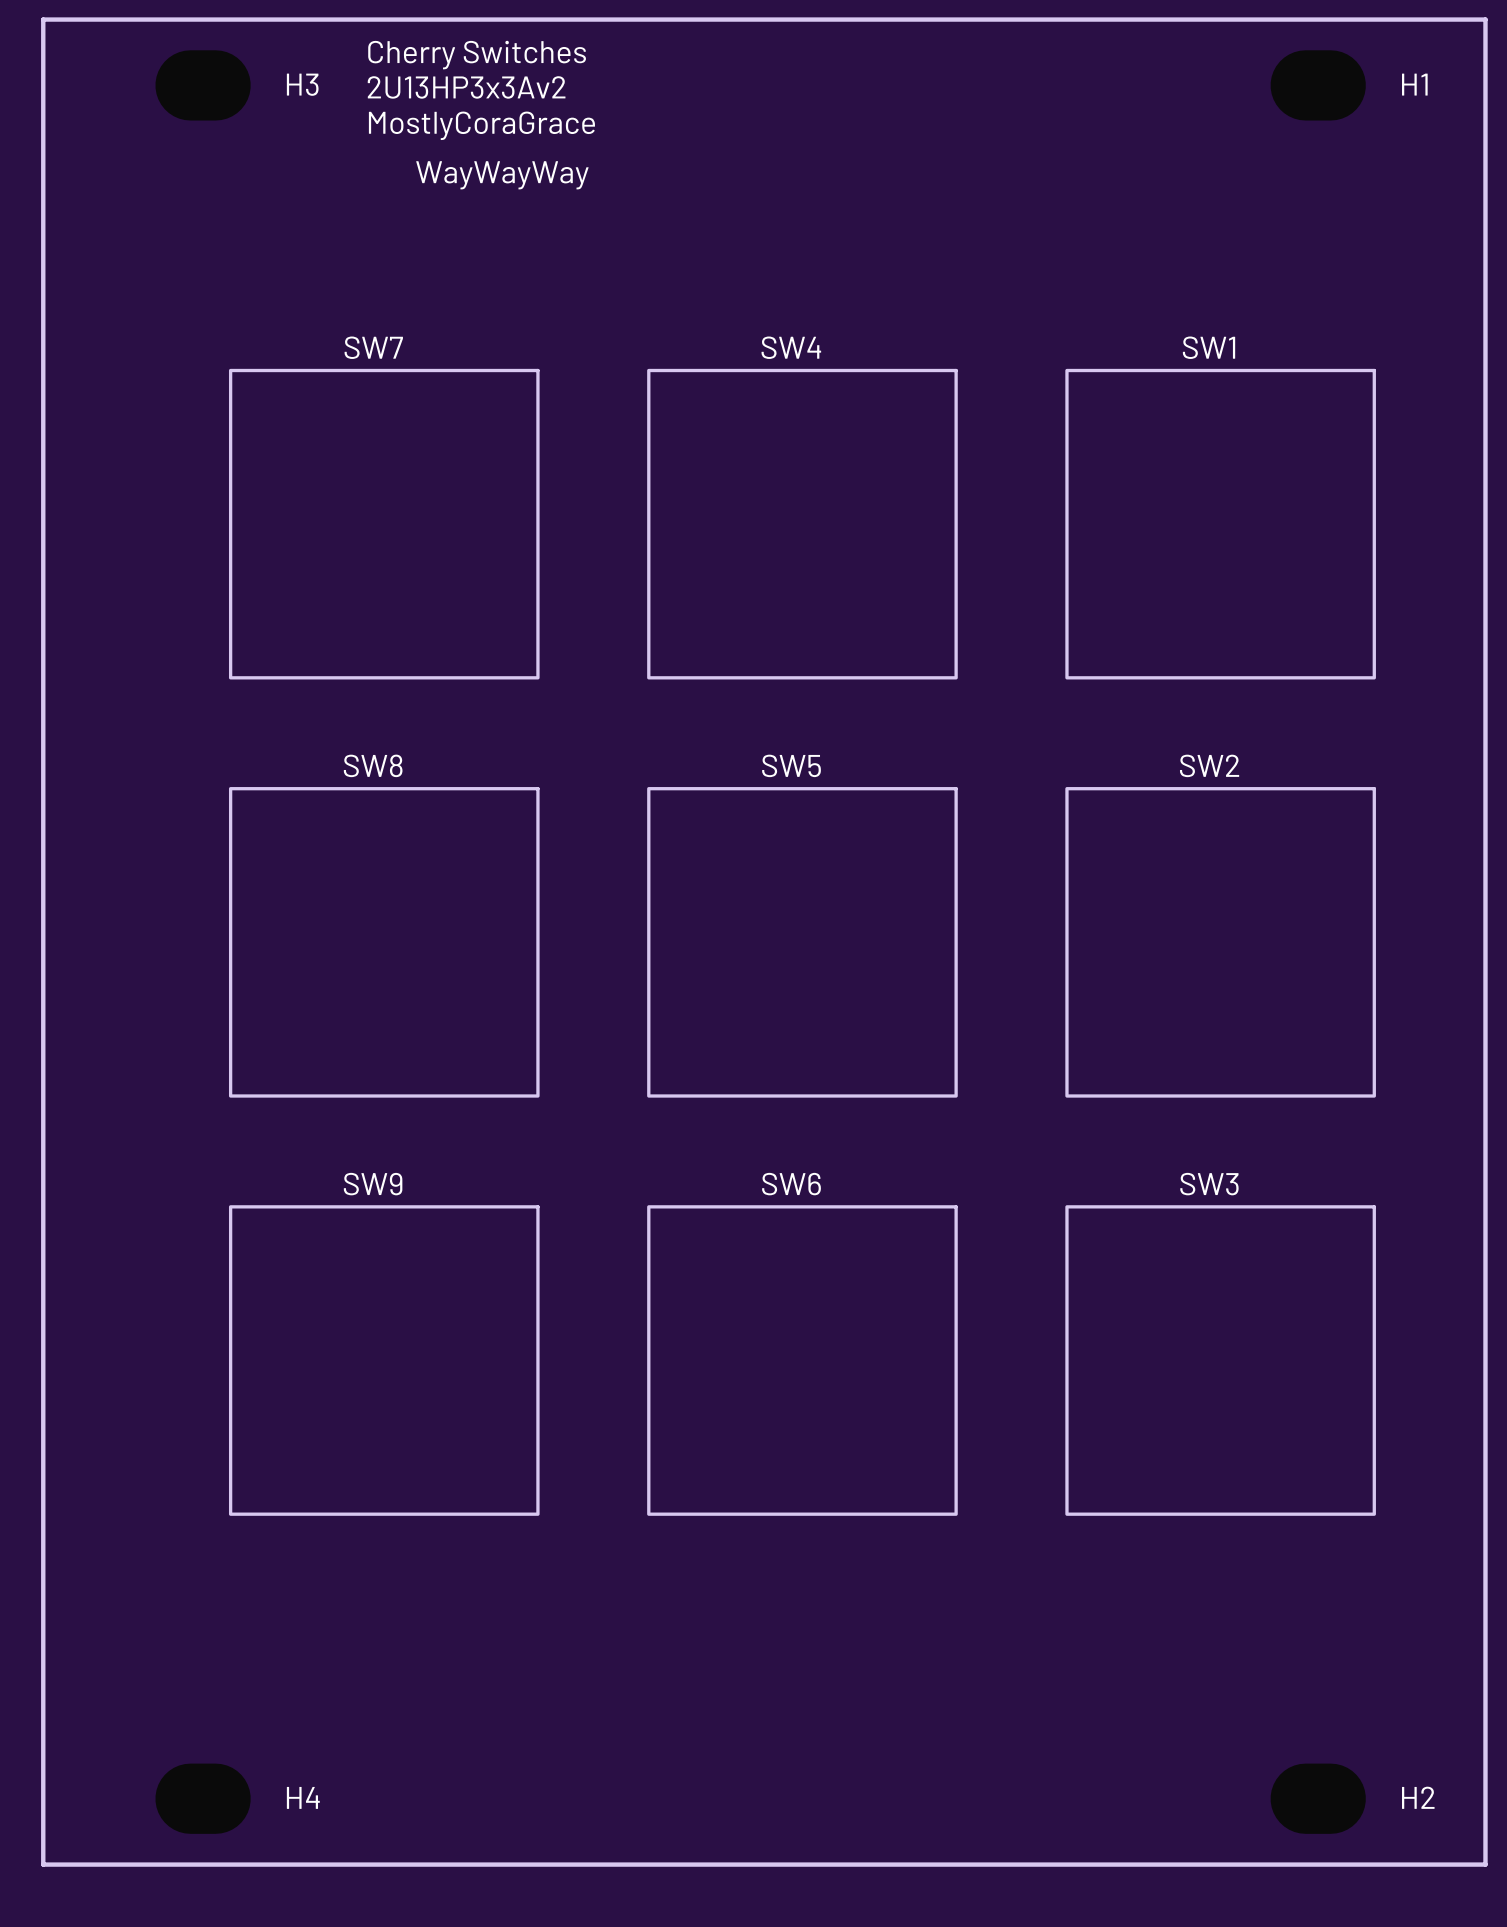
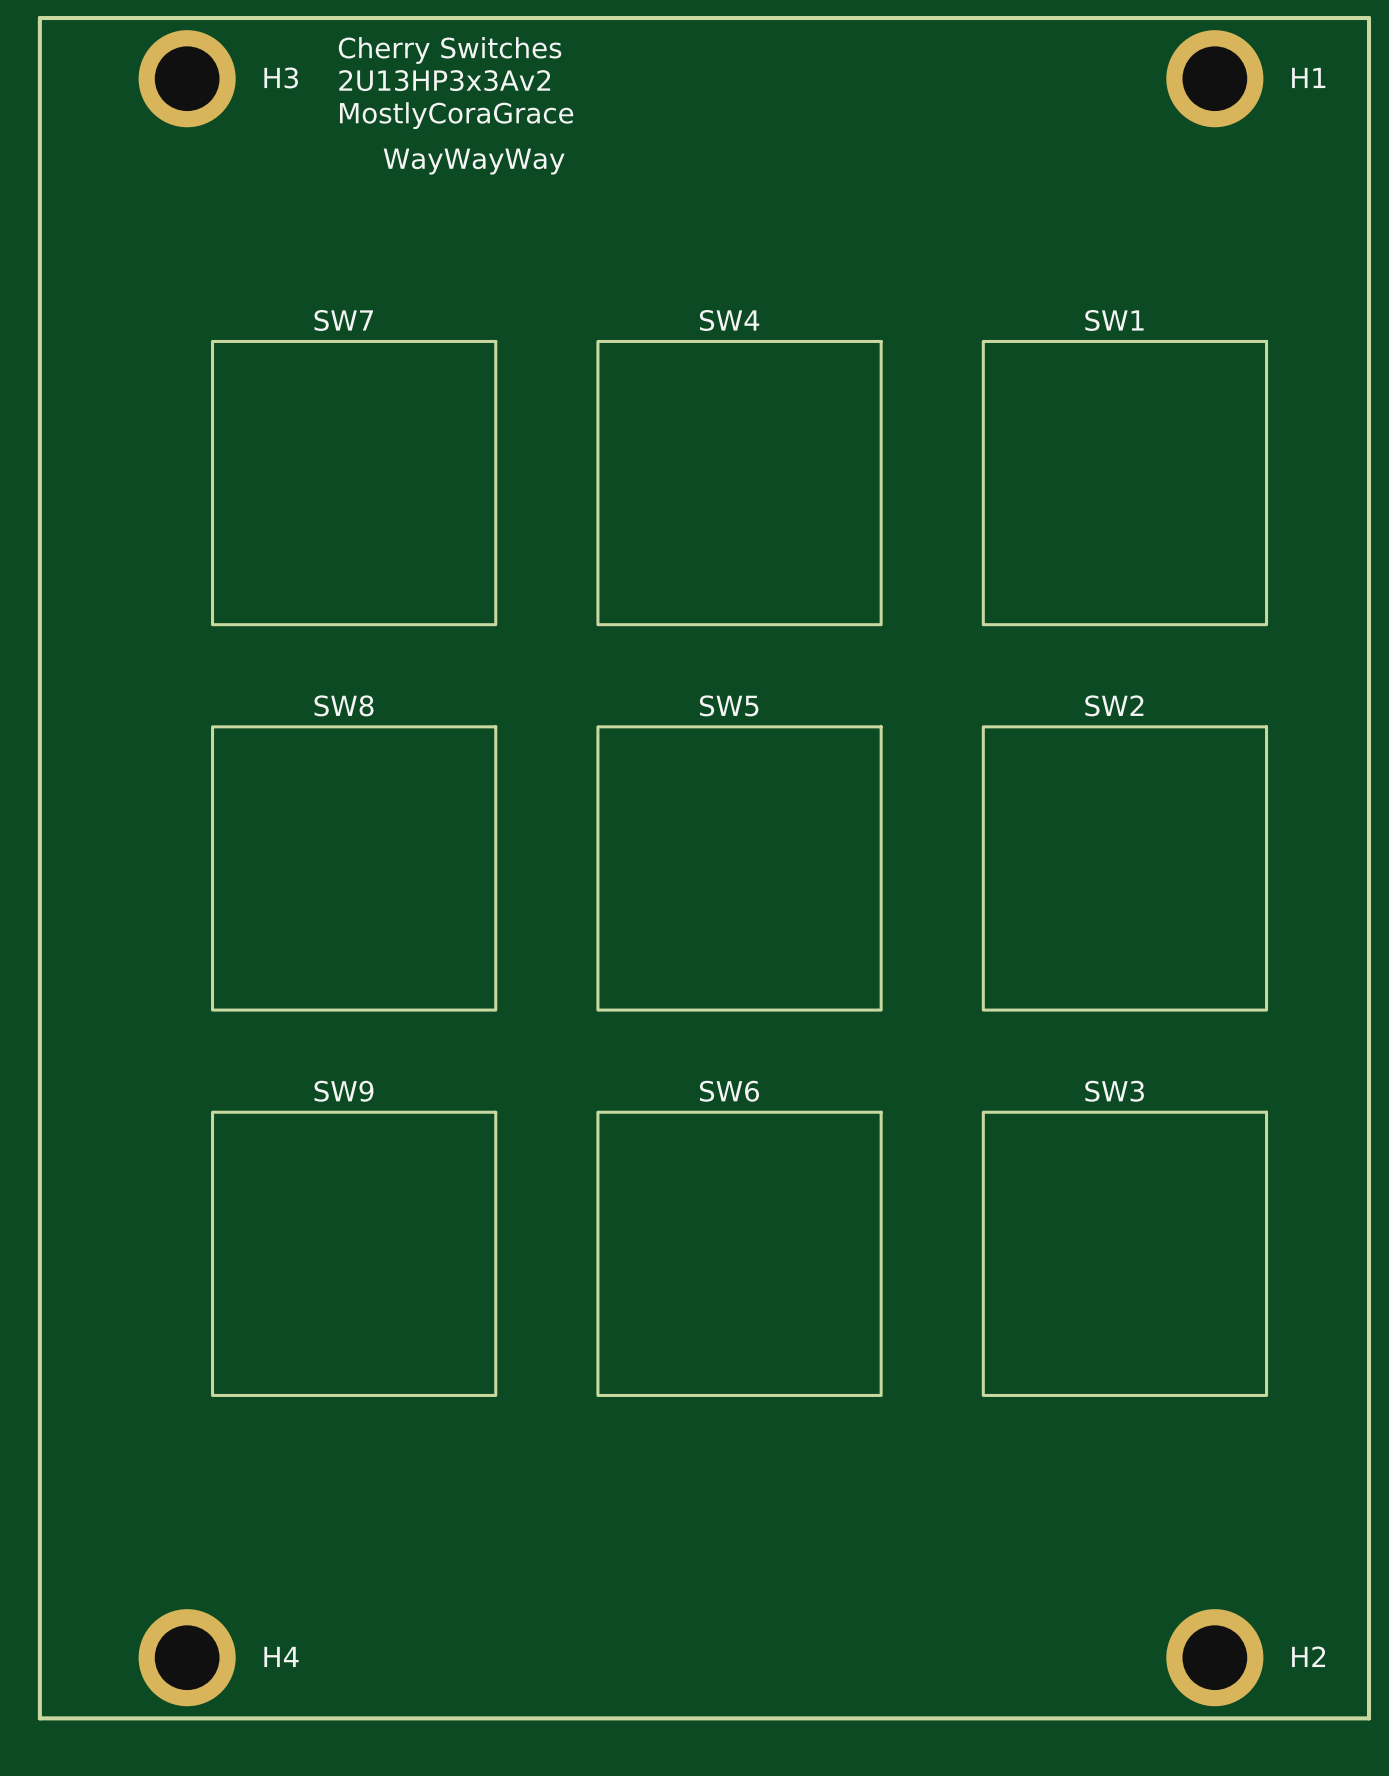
H3 footprint: [155, 50, 251, 121] -> [138, 30, 236, 128]
H1 footprint: [1270, 50, 1366, 121] -> [1166, 30, 1264, 128]
H4 footprint: [155, 1763, 251, 1834] -> [138, 1609, 236, 1707]
H2 footprint: [1270, 1763, 1366, 1834] -> [1166, 1609, 1264, 1707]

